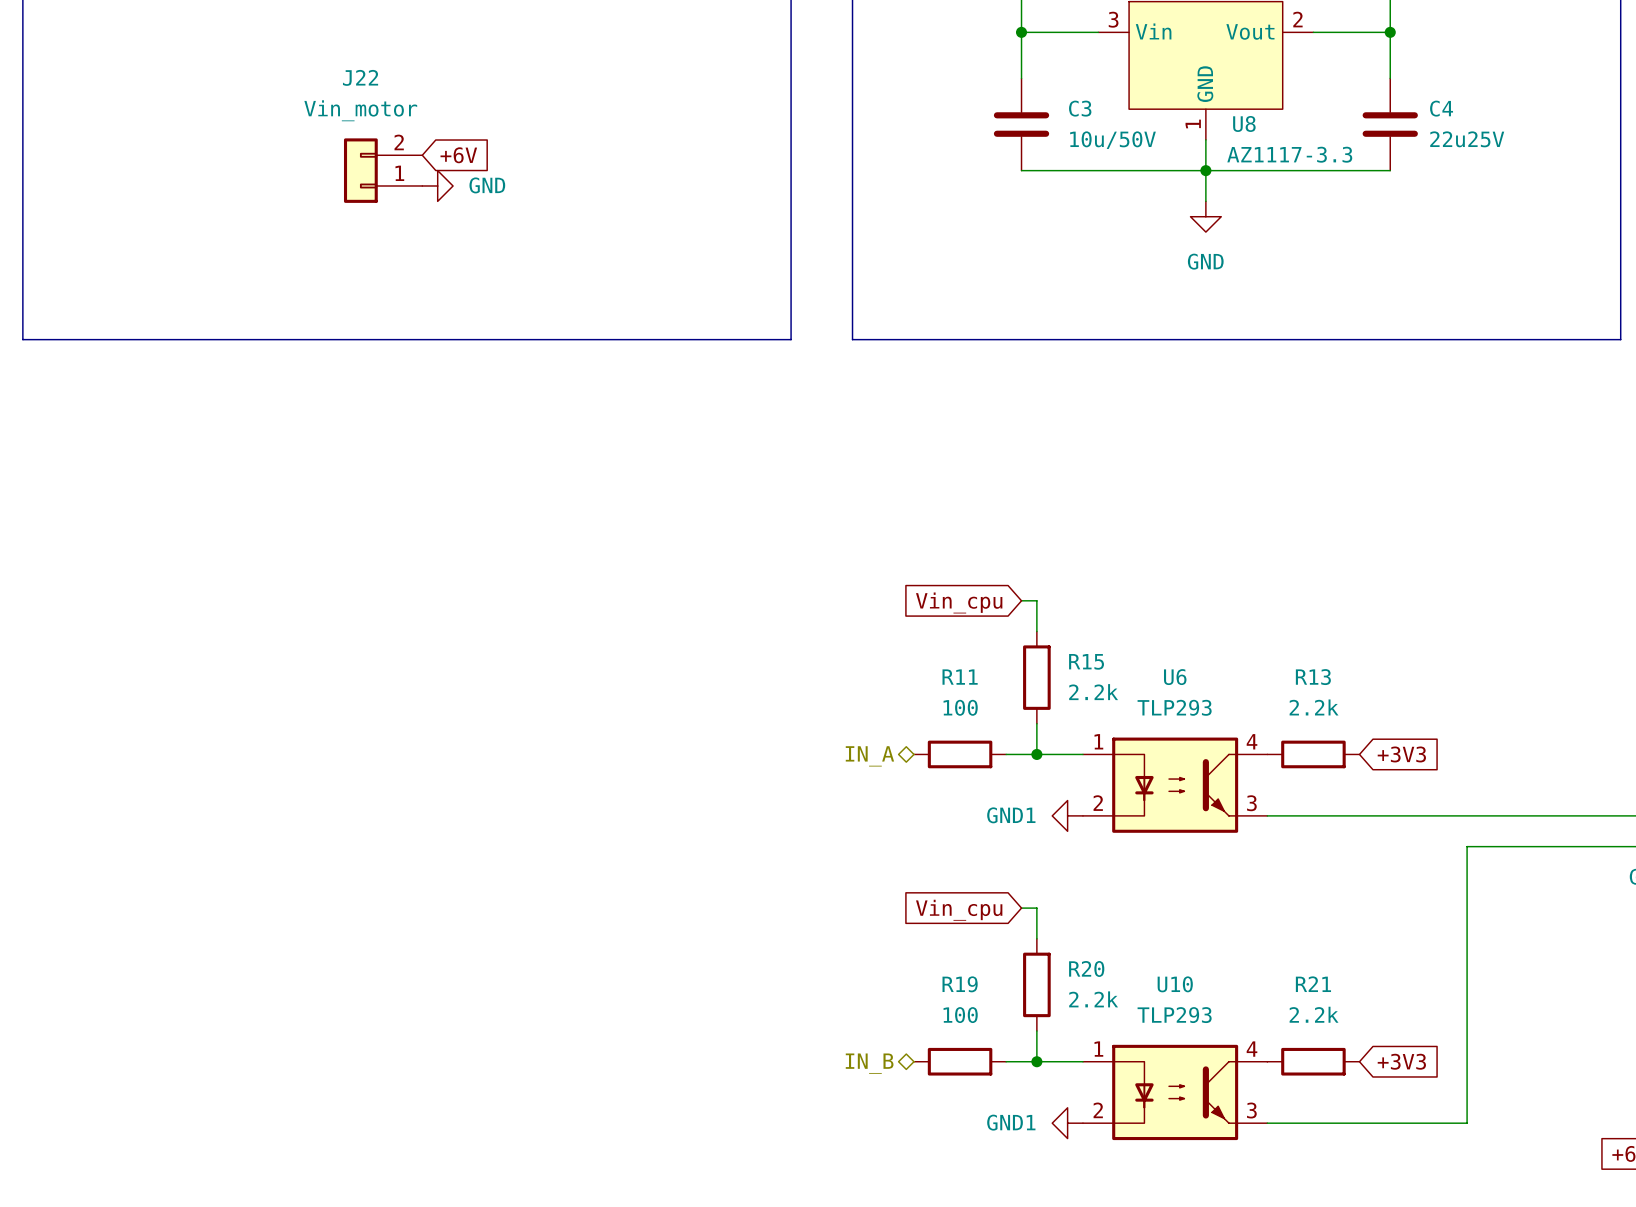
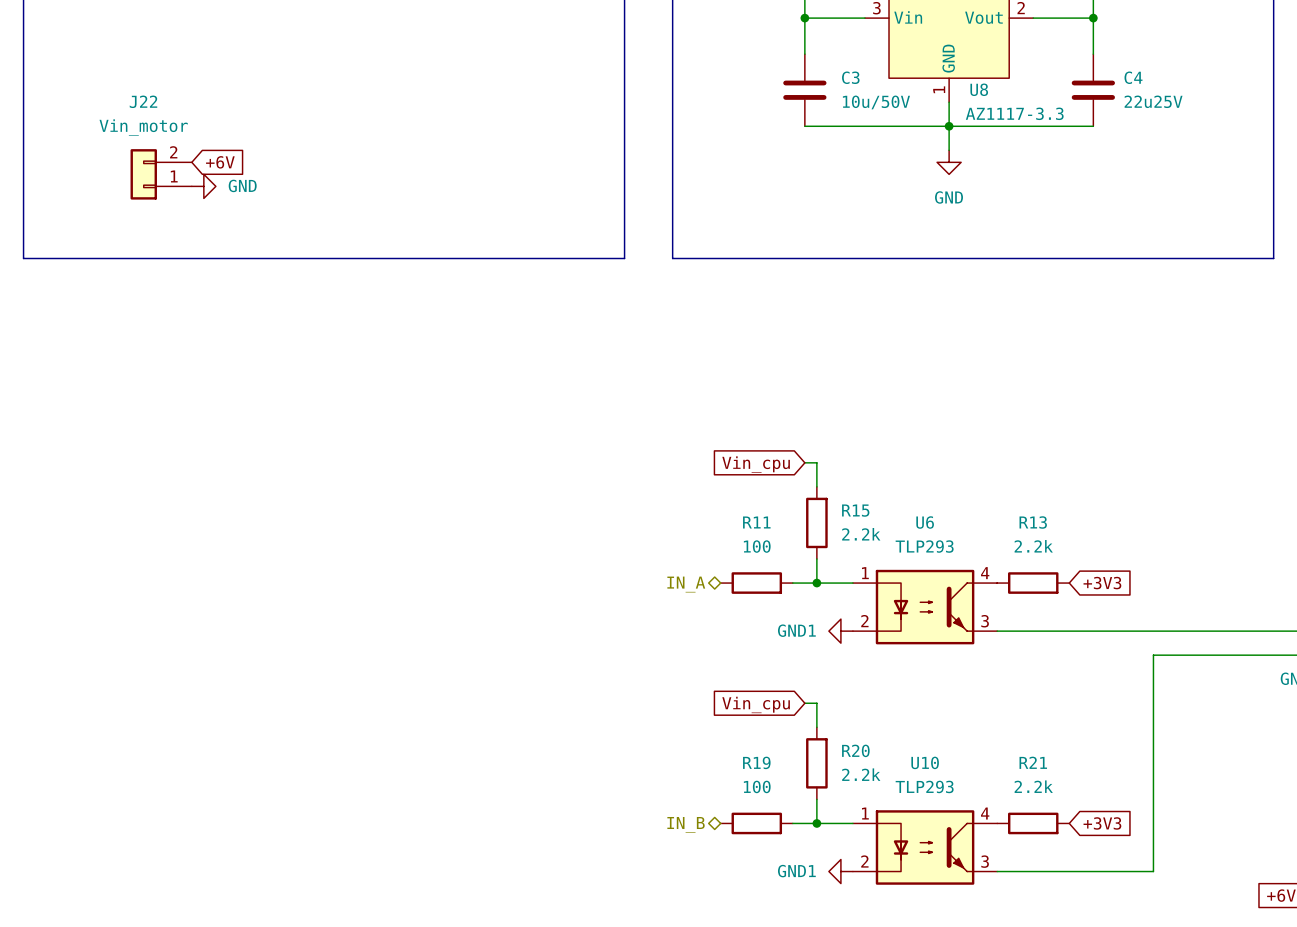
global label position: +6V (458, 155) -> +6V (220, 162)
J22 position: (383, 170) -> (161, 174)
power symbol position: GND (437, 185) -> GND (203, 186)

